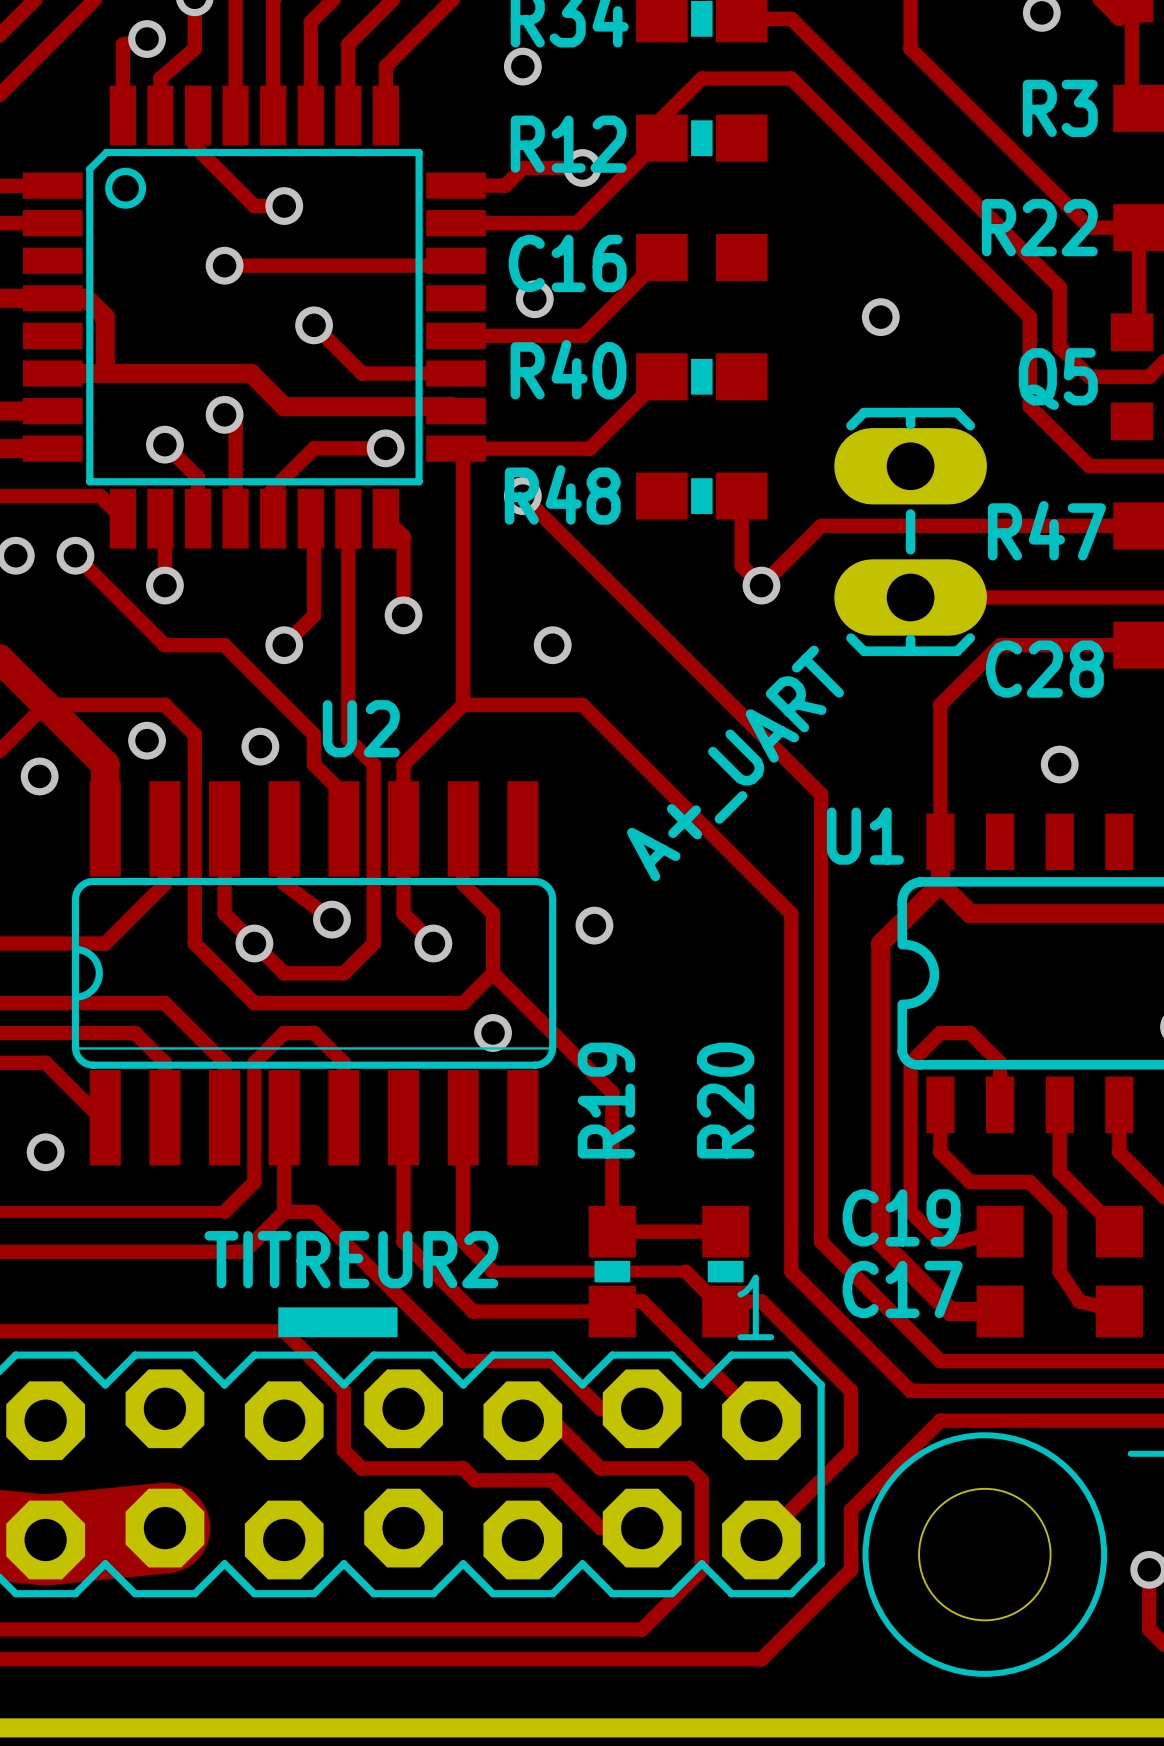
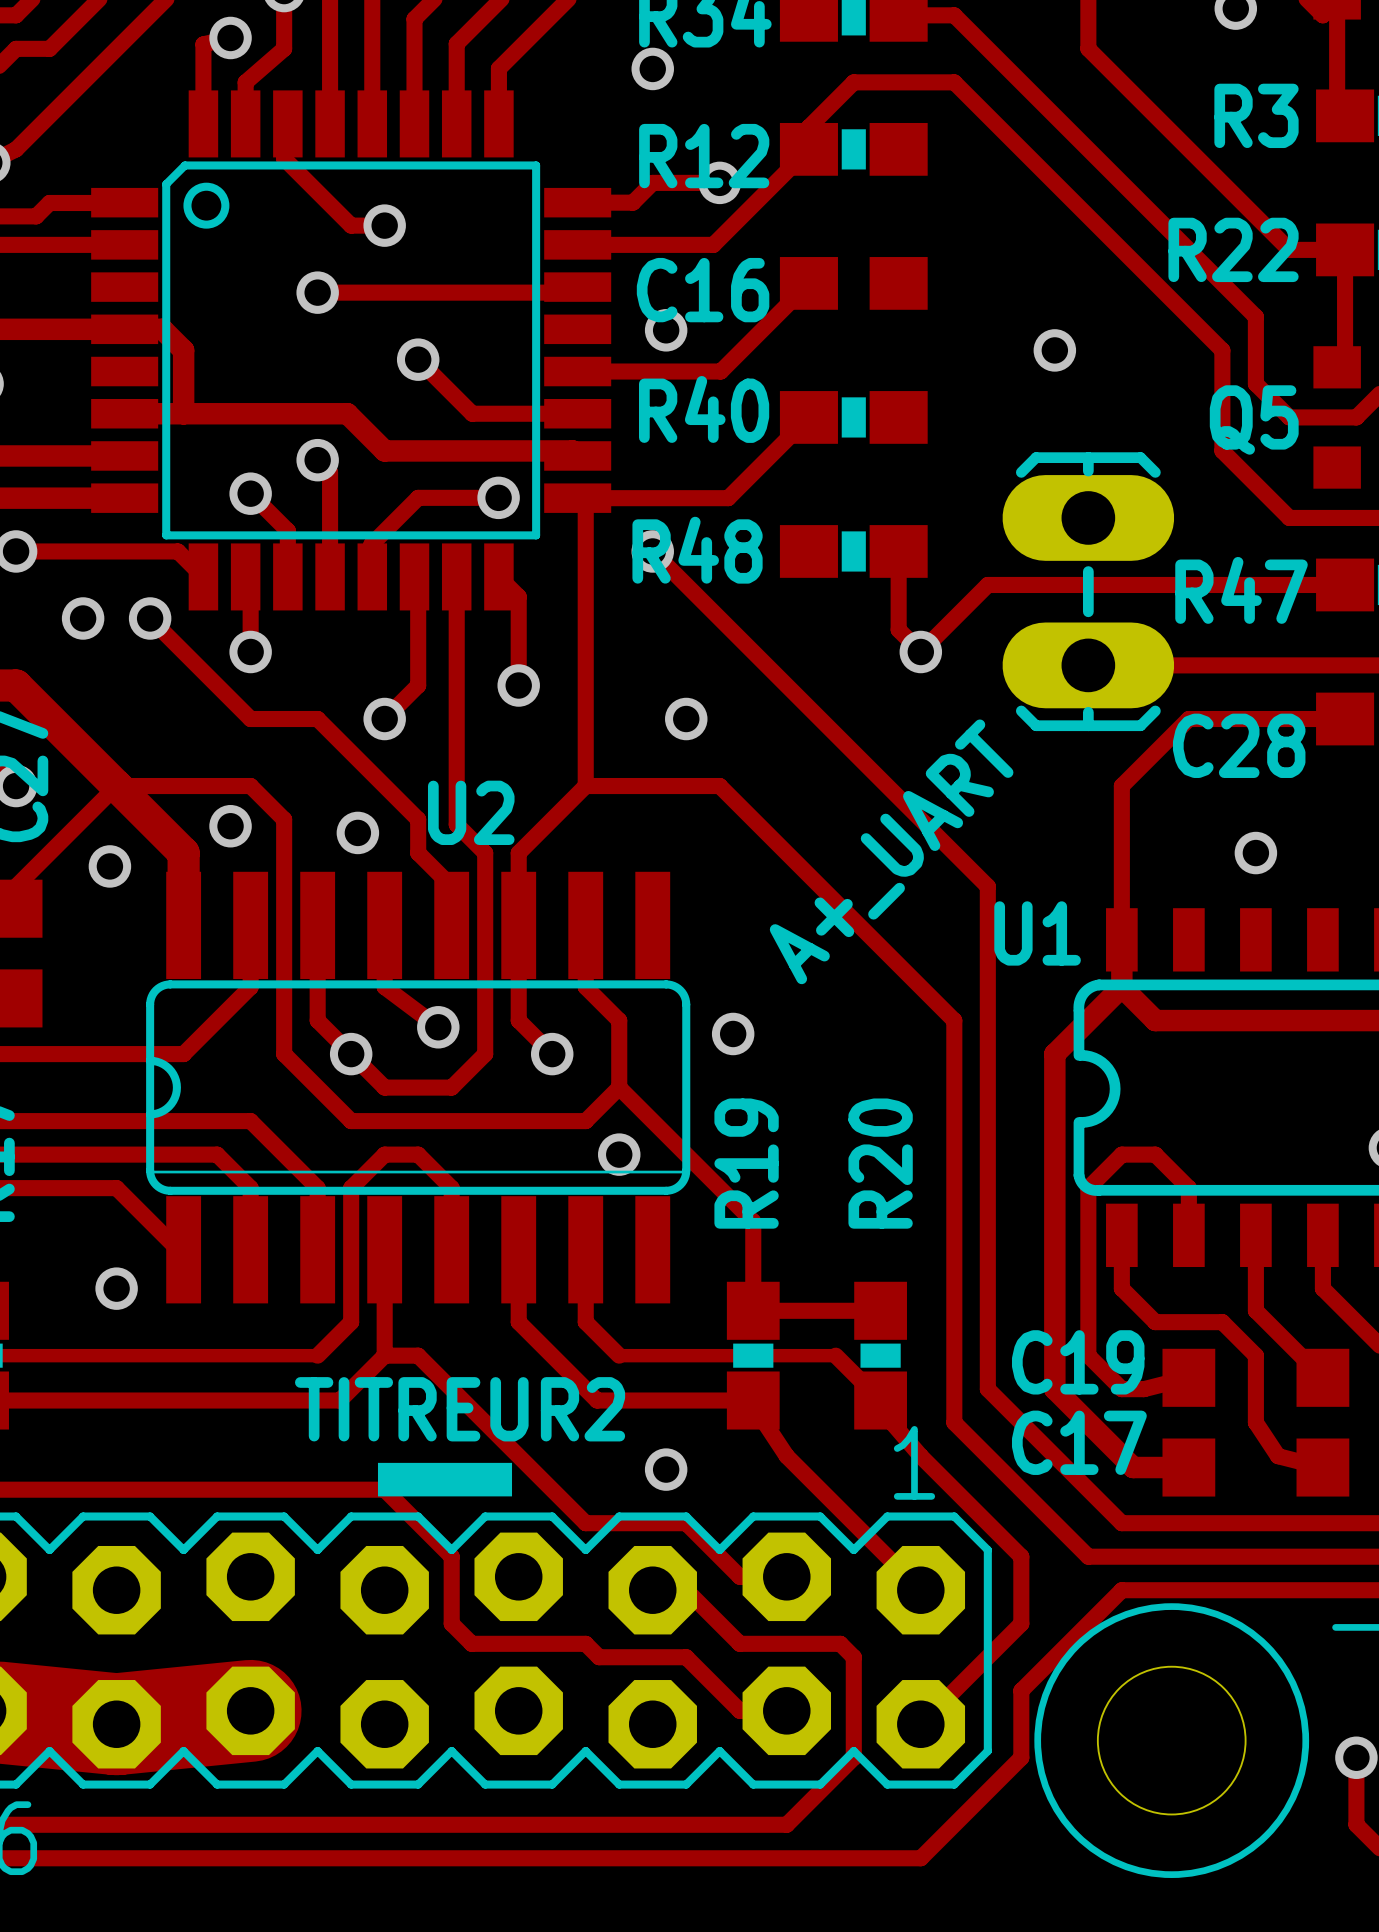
track: (612, 1171) (612, 1231) (725, 1231) -> (753, 1310) (880, 1310)
track: (403, 1182) (403, 1241) (473, 1311) (612, 1311) (622, 1301) (642, 1301) -> (597, 1400) (753, 1400) (764, 1422) (786, 1456)
track: (463, 1182) (463, 1241) -> (518, 1322) (585, 1389)
track: (473, 1251) (493, 1271) (685, 1271) (725, 1311) (735, 1301) (761, 1301) -> (585, 1322) (619, 1355) (835, 1355) (880, 1400) (891, 1422) (920, 1456)
R19 position: (612, 1271) -> (753, 1355)
R20 position: (725, 1271) -> (880, 1355)
via: none -> (666, 1469)

